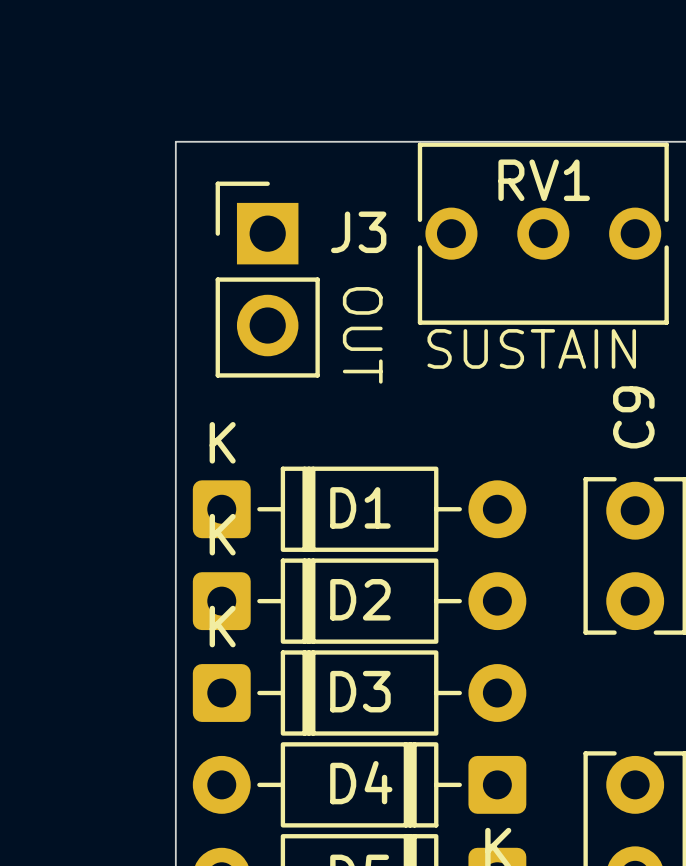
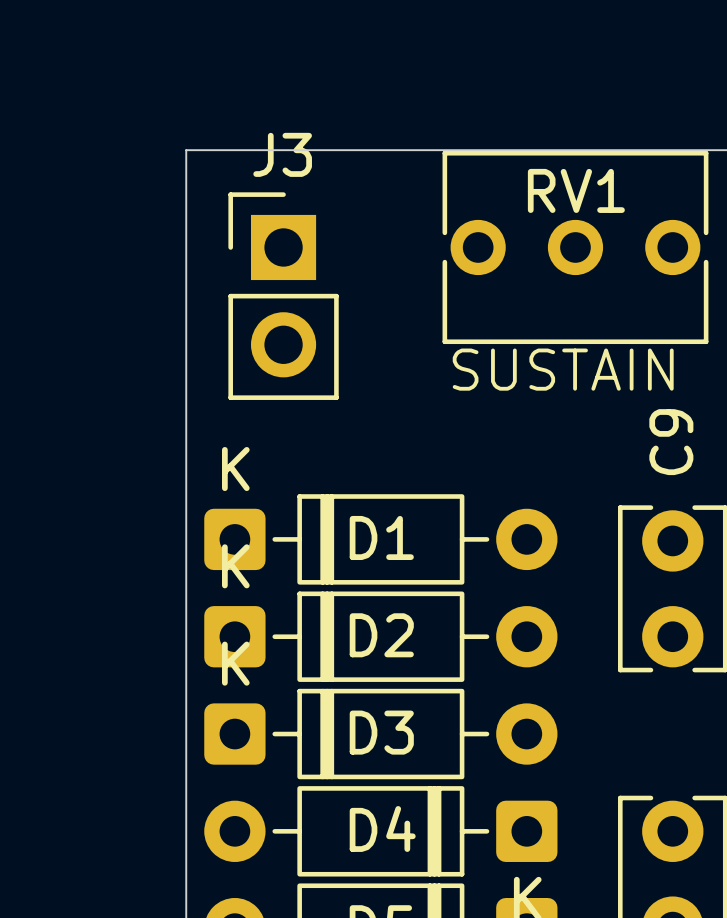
J3 name position: J3 (358, 232) -> J3 (282, 154)
text: OUT (362, 335) -> none

